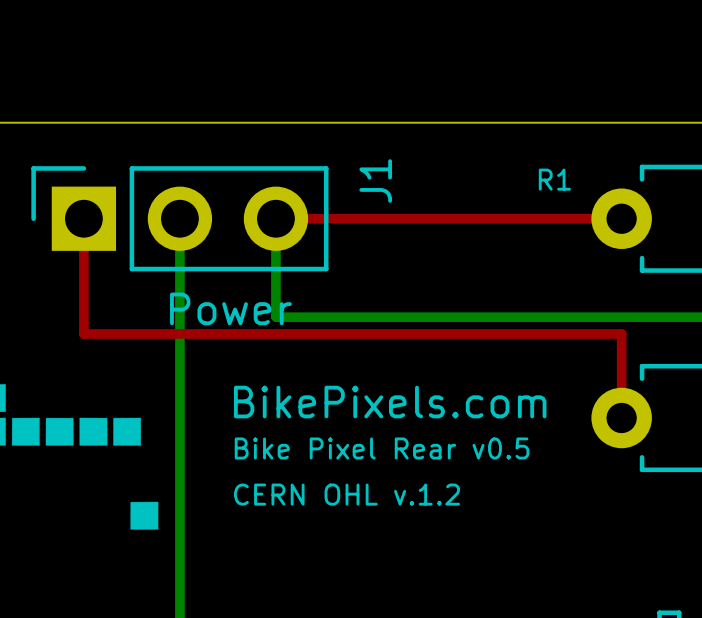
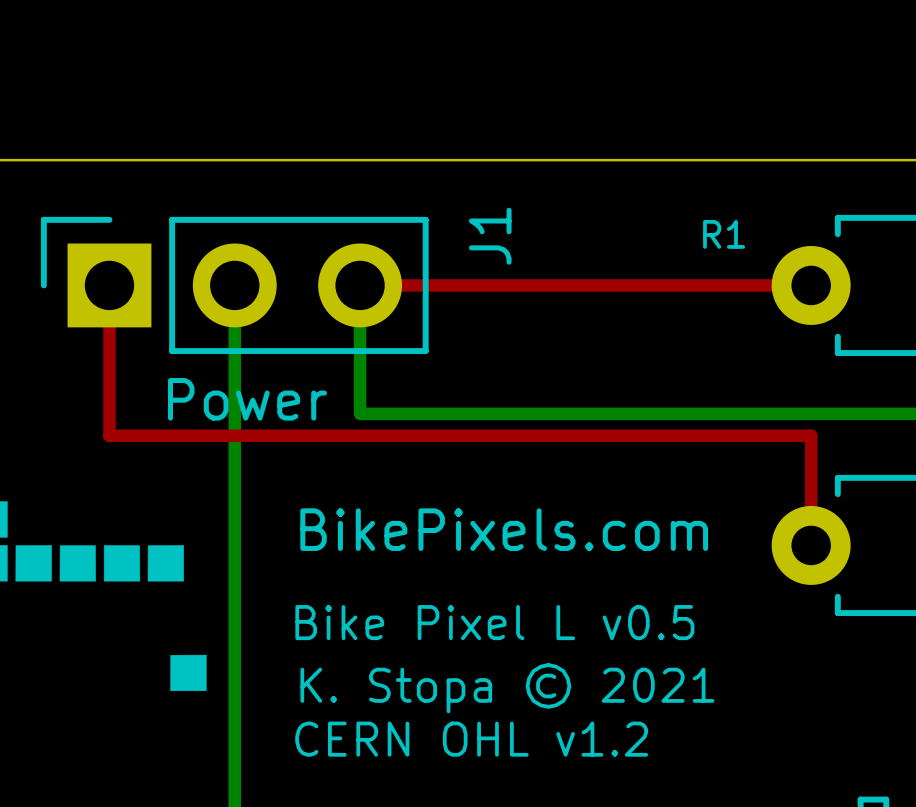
J1 value position: Power (230, 308) -> Power (247, 399)
Bike Pixel Rear v0.5 value: BikePixels.com (390, 402) -> Bike Pixel L v0.5 (494, 622)
Bike Pixel Rear v0.5 name: Bike Pixel Rear v0.5 (382, 448) -> CERN OHL v1.2 (471, 739)
K. Stopa © 2021: none -> BikePixels.com (507, 610)
CERN OHL v.1.2: (347, 494) -> none

